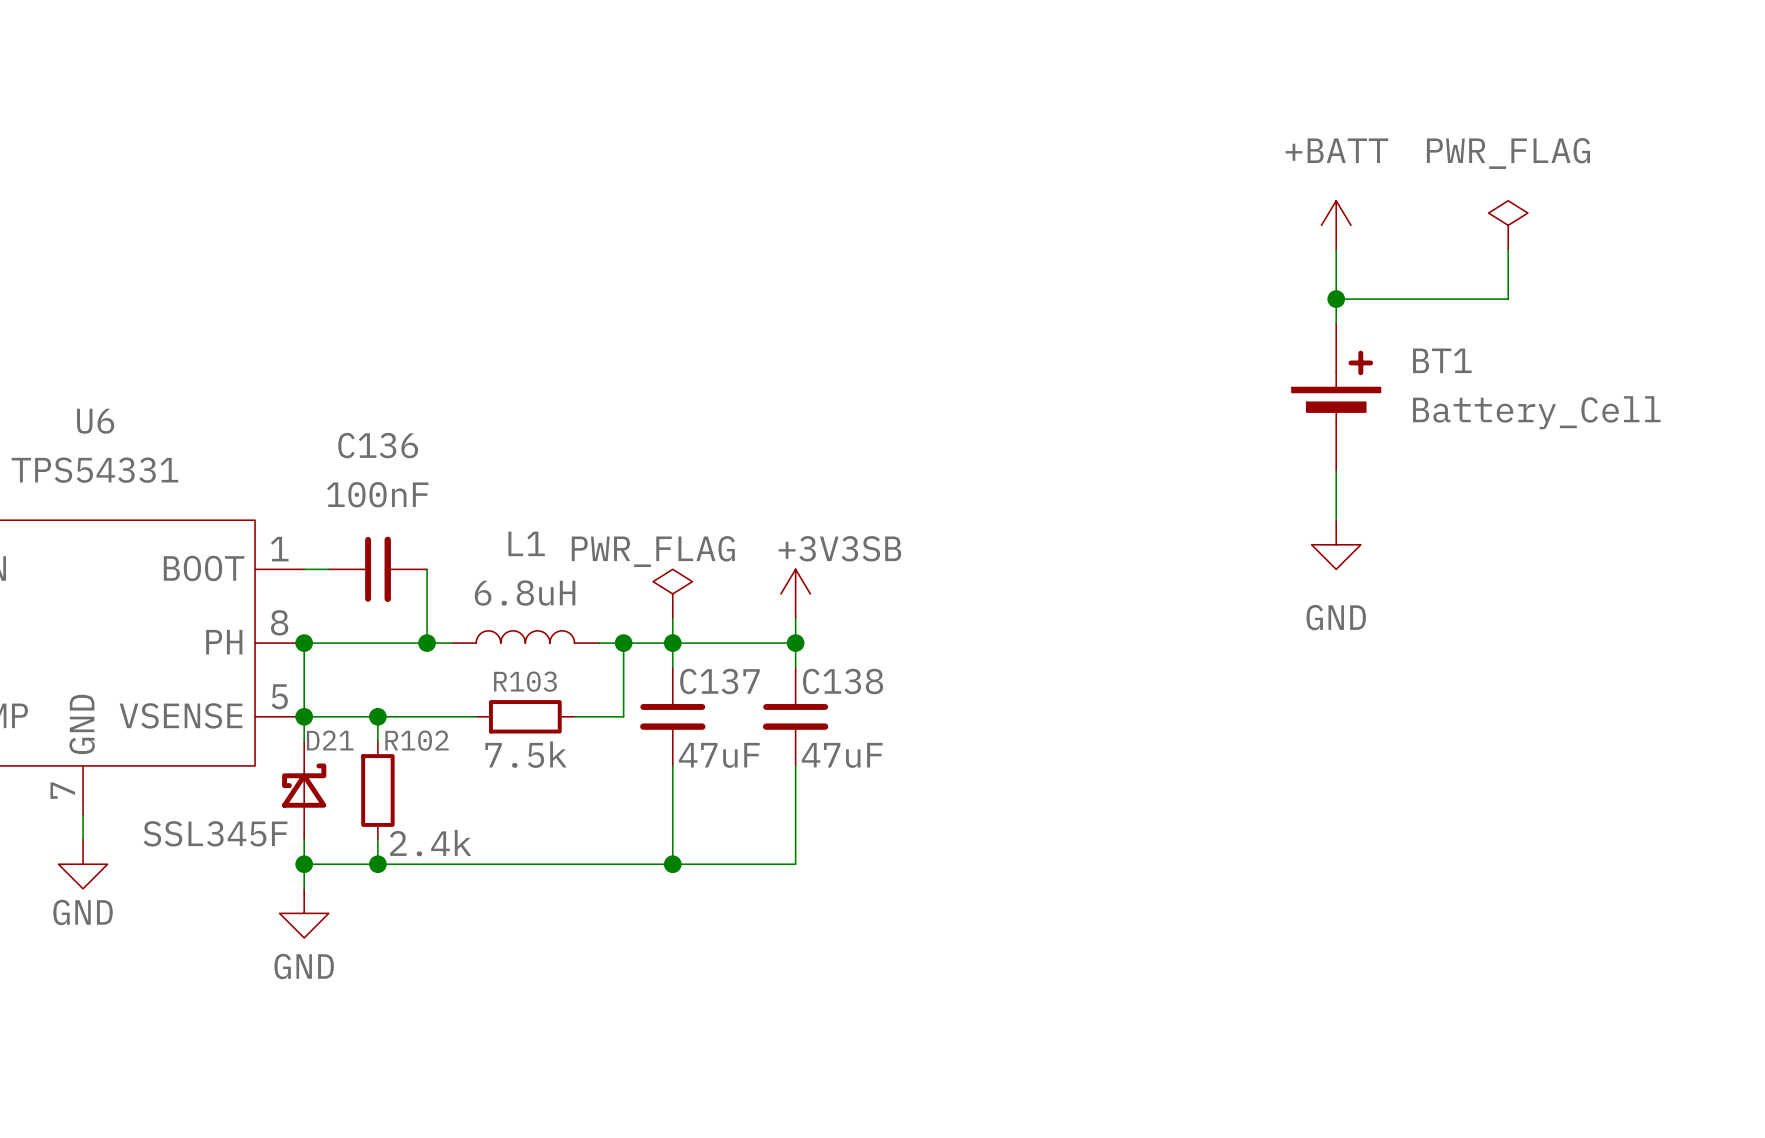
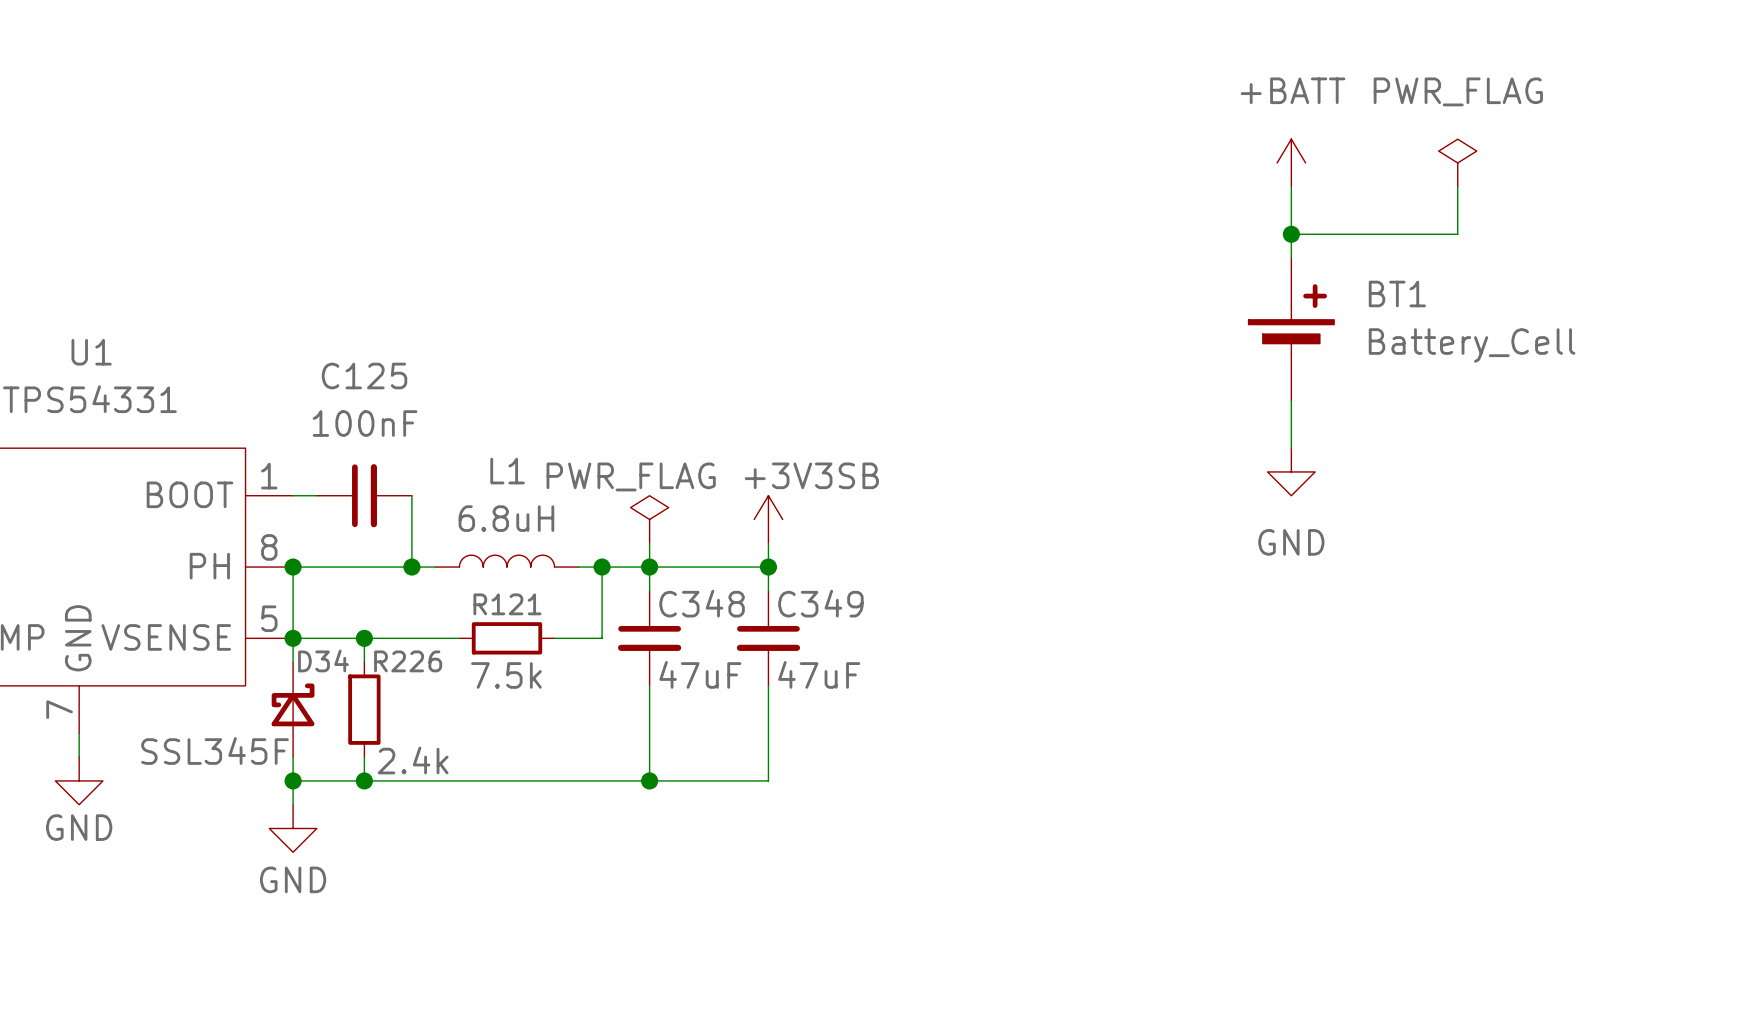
U6 name: U6 (95, 421) -> U1 (91, 352)
C136 name: C136 (378, 445) -> C125 (364, 376)
R103 name: R103 (525, 681) -> R121 (507, 604)
C137 name: C137 (719, 681) -> C348 (702, 603)
C138 name: C138 (843, 681) -> C349 (820, 603)
D21 name: D21 (330, 740) -> D34 (323, 660)
R102 name: R102 (417, 740) -> R226 (408, 661)

